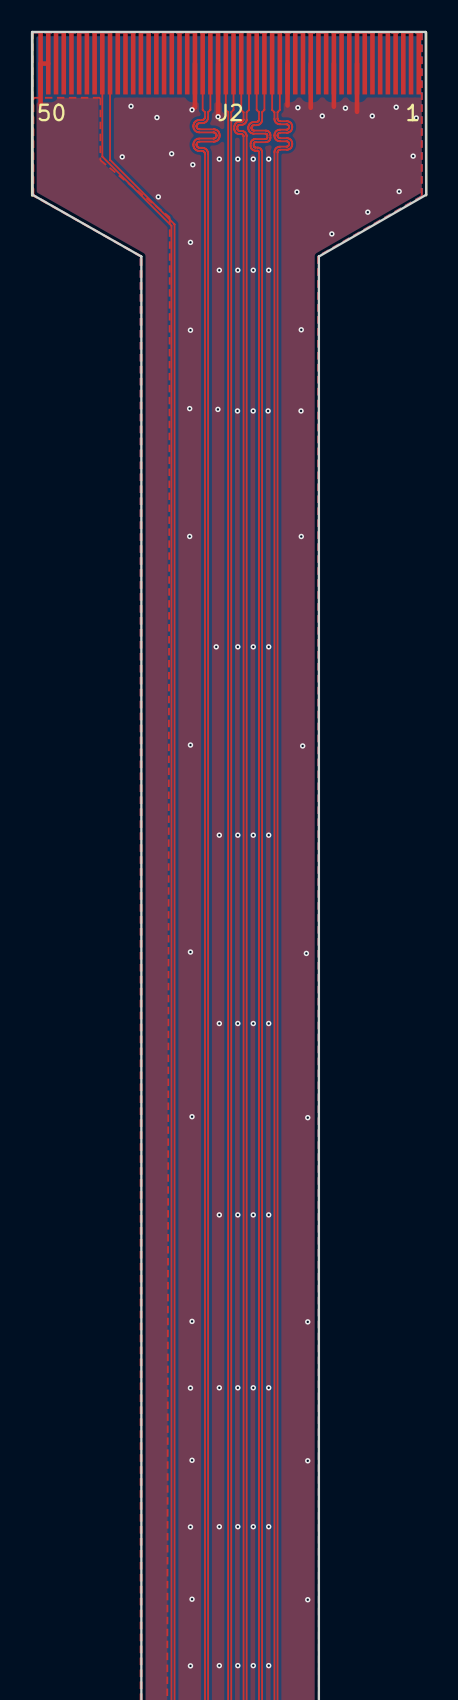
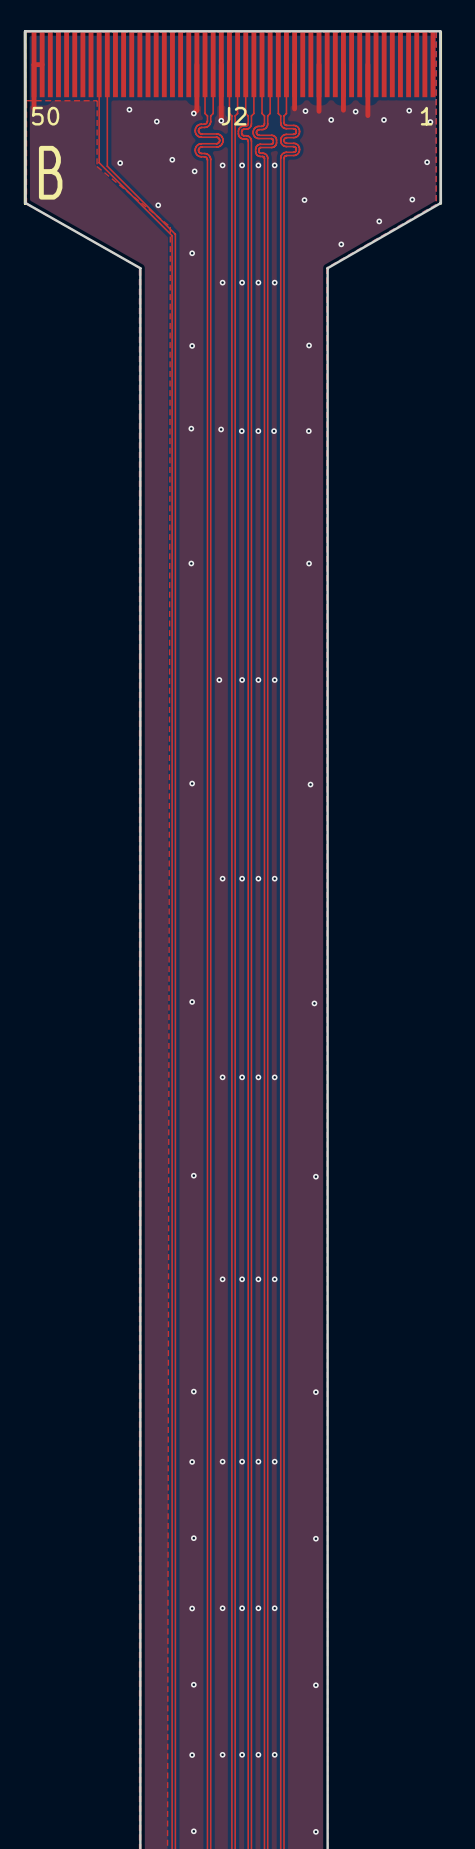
text: none -> B (50, 172)

